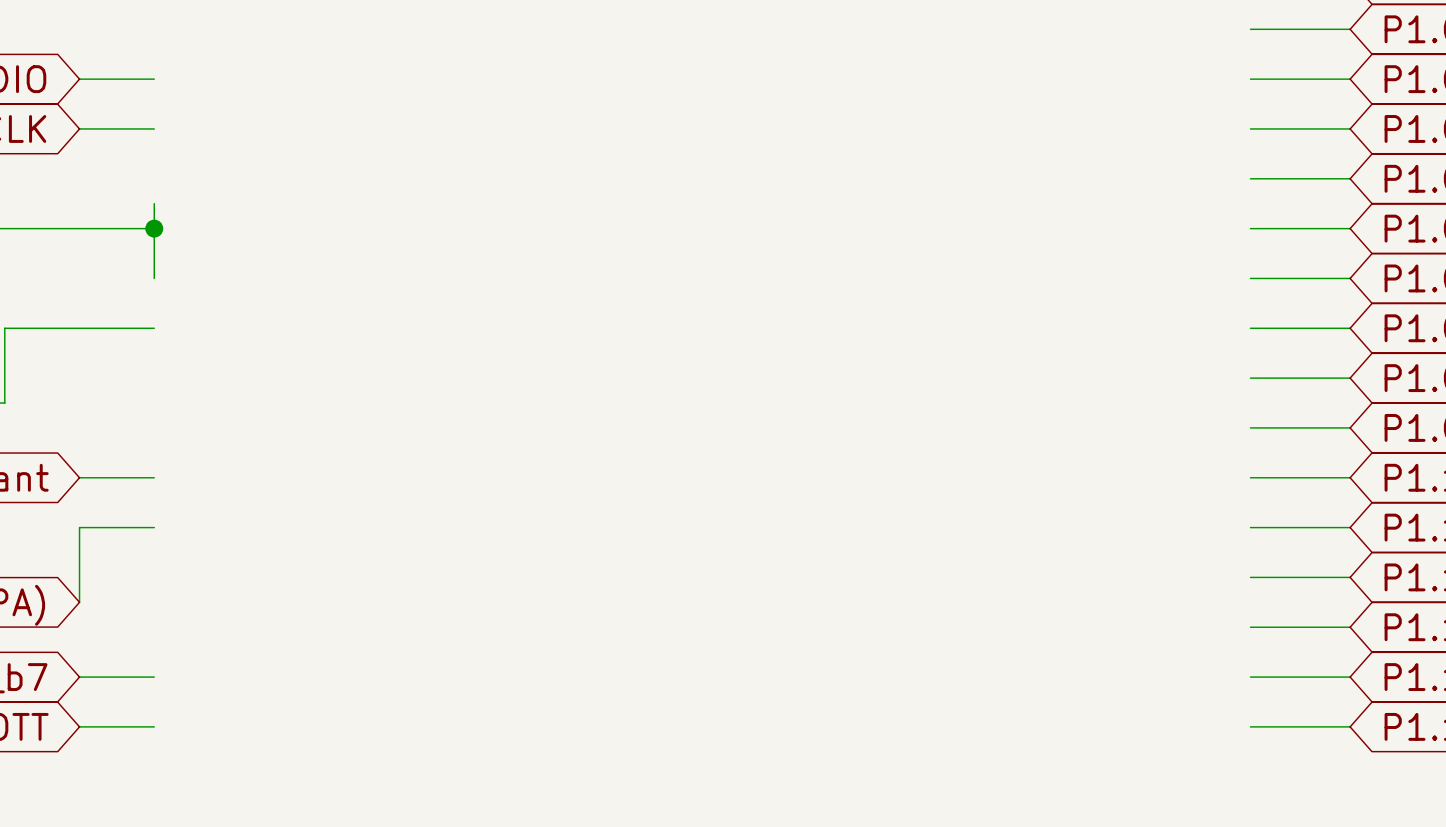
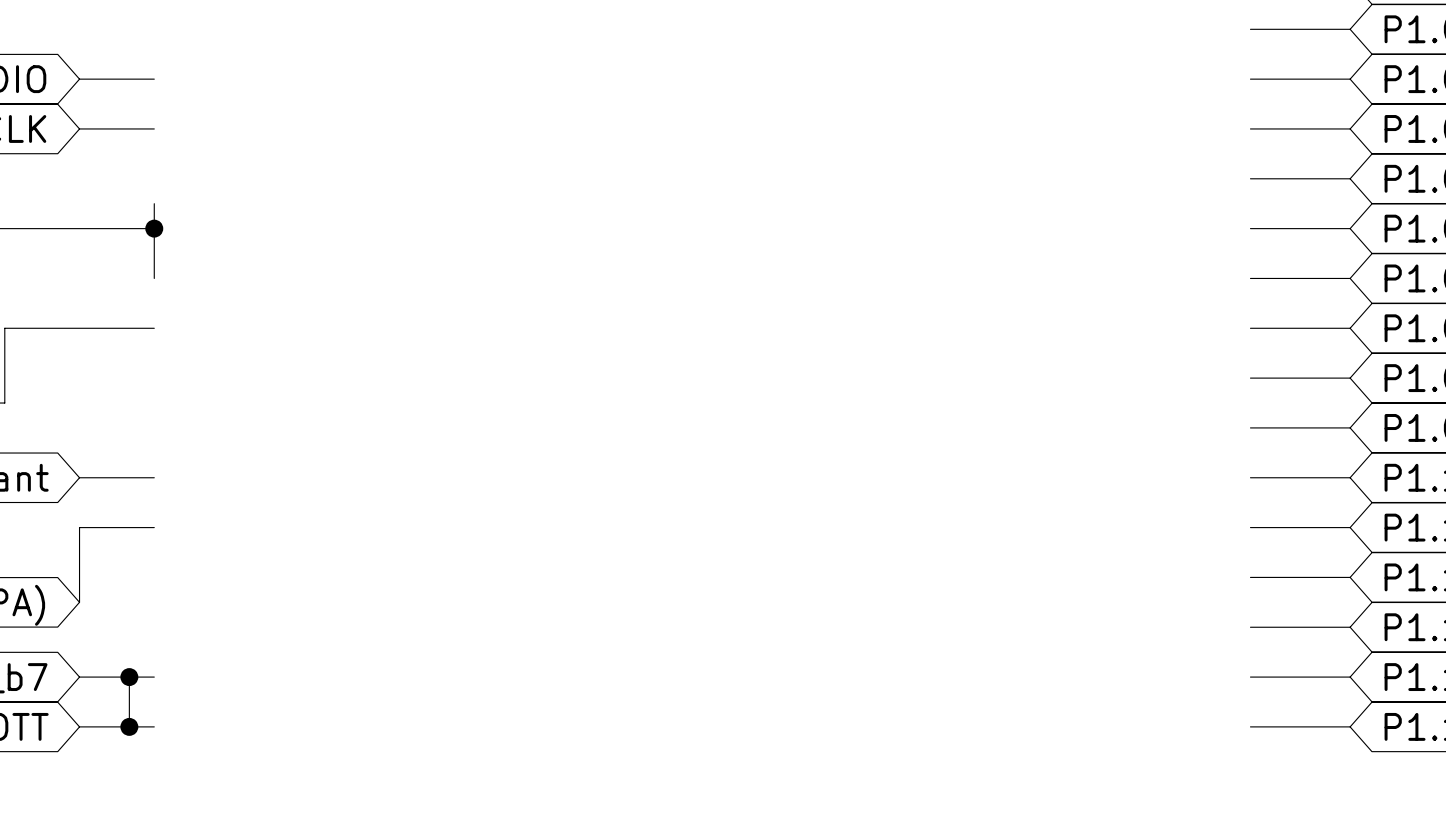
wire: none -> (129, 677) (129, 726)
junction: none -> (129, 677)
junction: none -> (129, 726)

